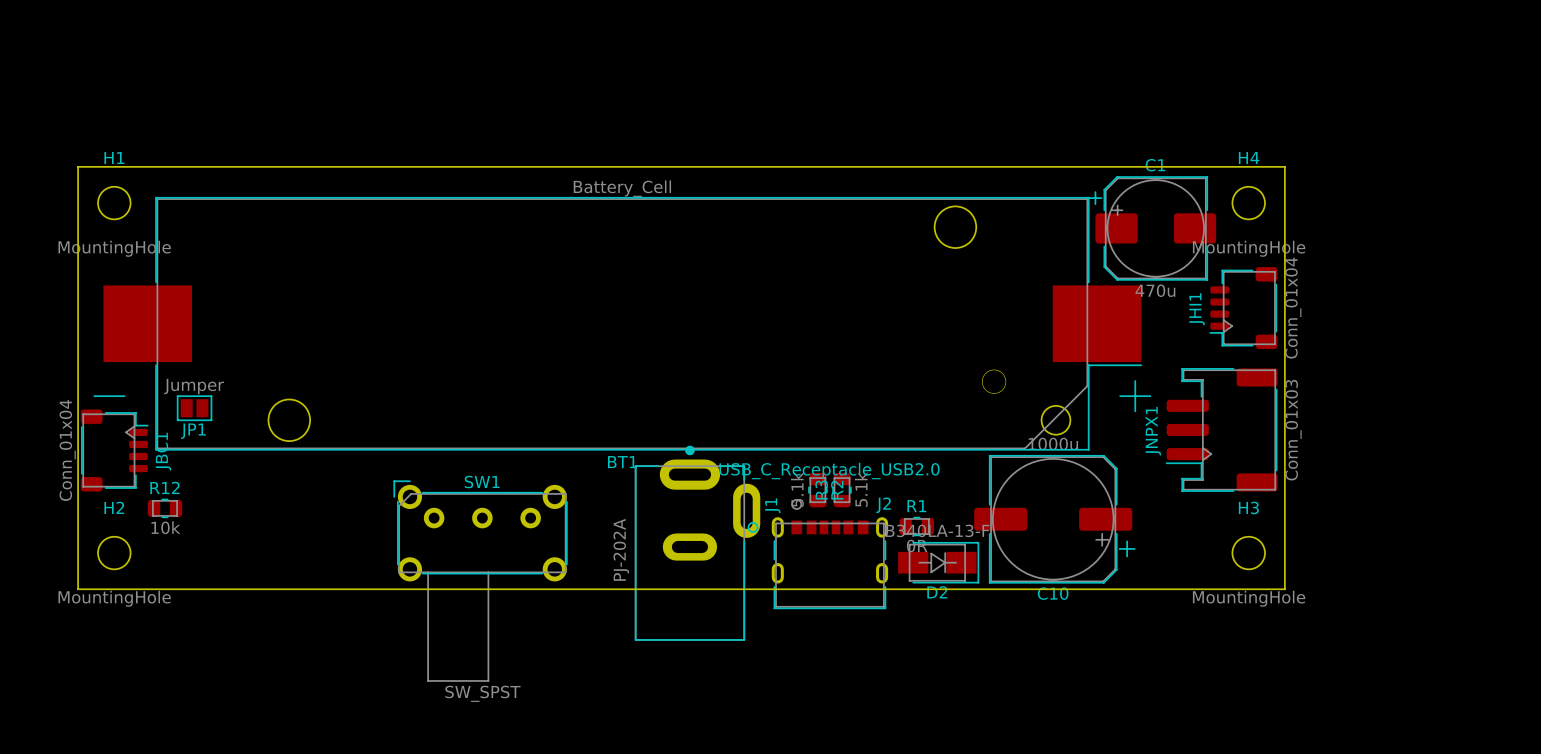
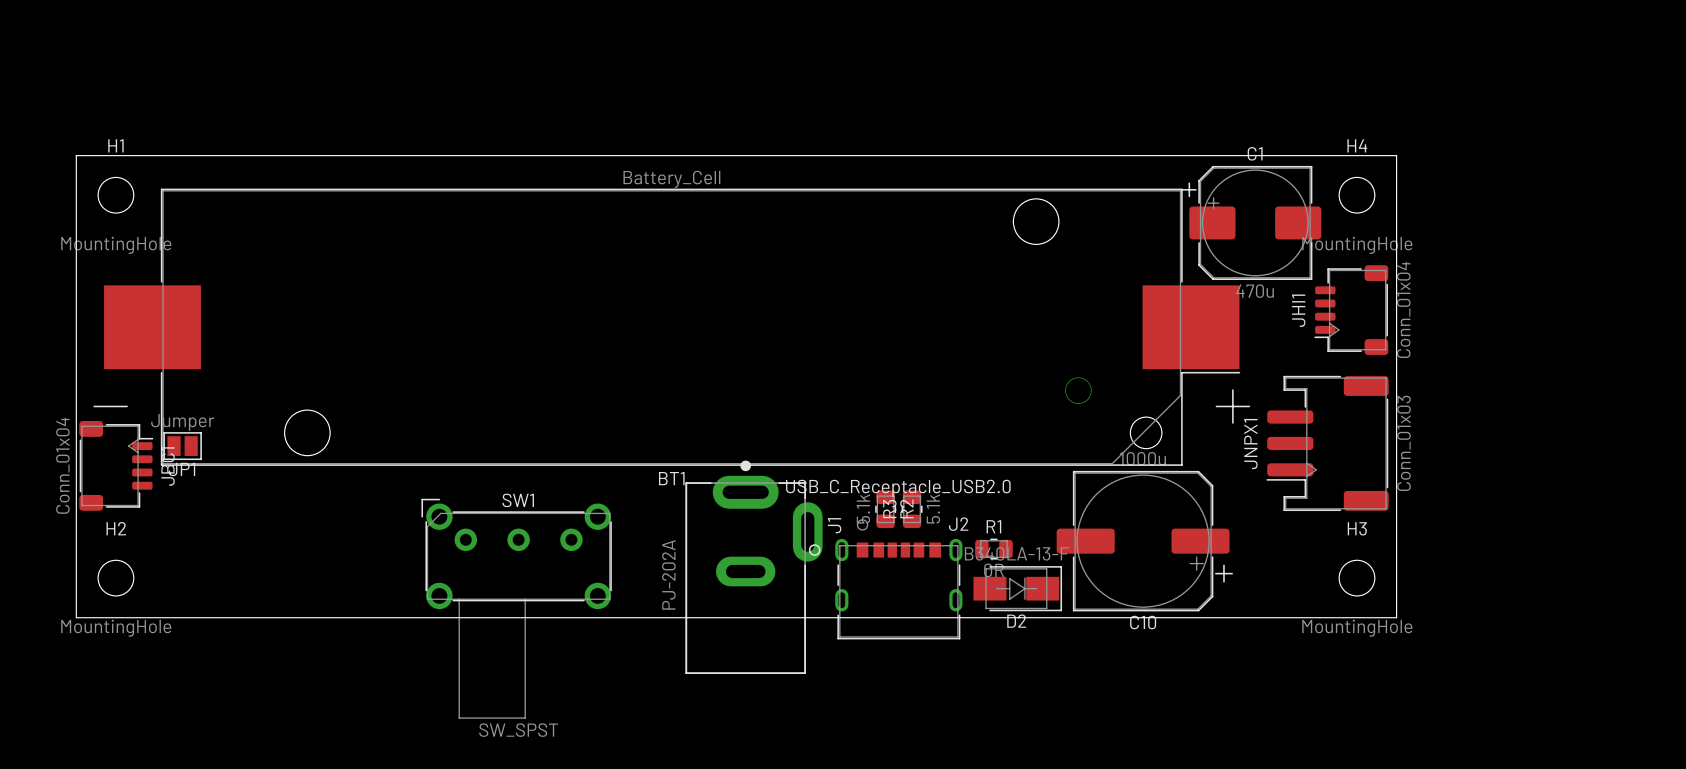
JP1 position: (194, 408) -> (182, 446)
R12: 10k (164, 508) -> none

